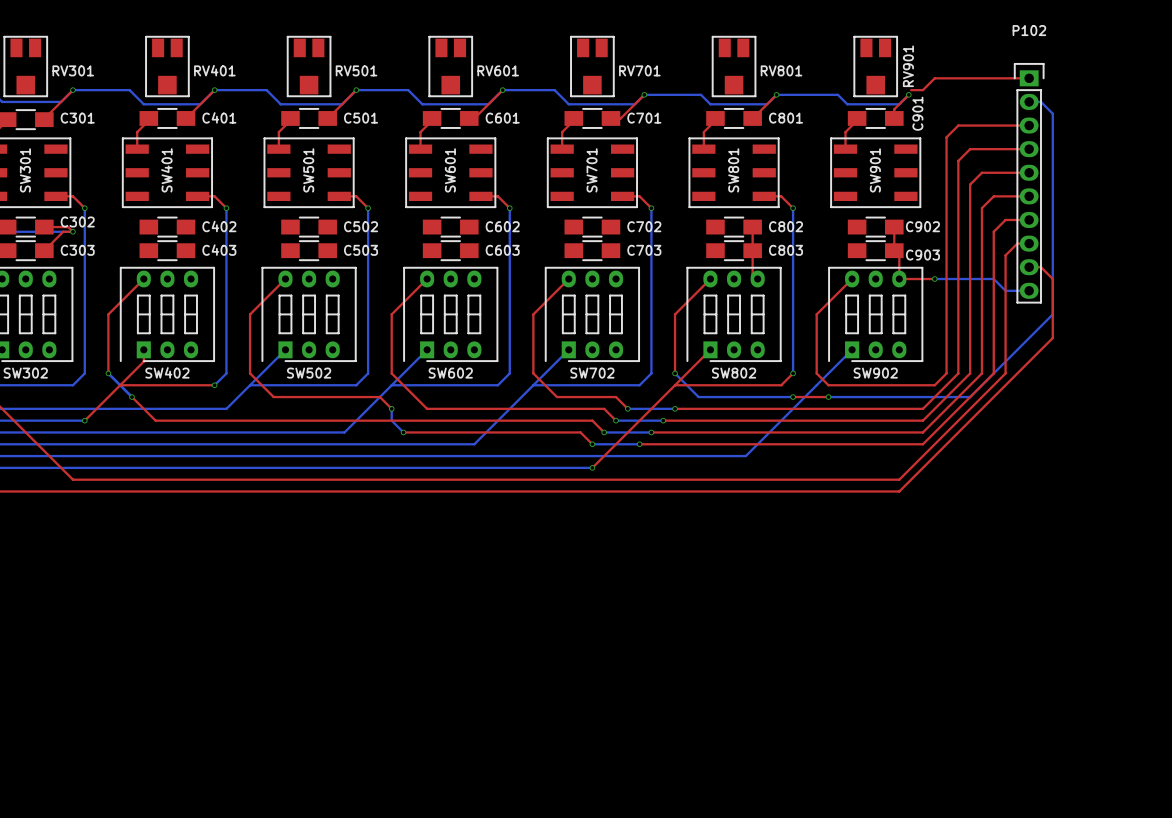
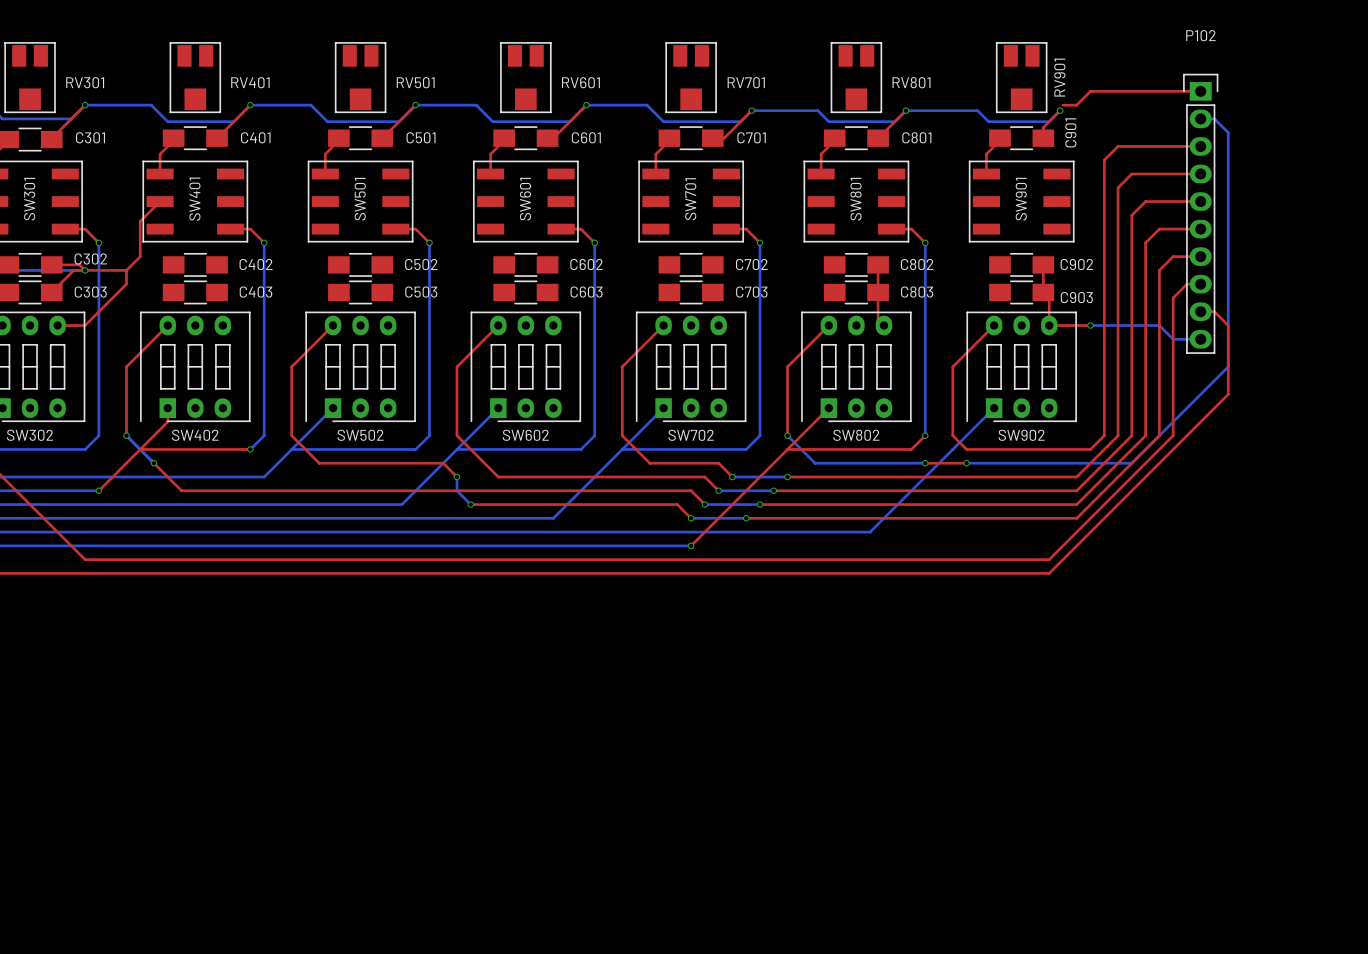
top track: none -> (160, 201) (140, 221) (140, 256) (126, 270)
top track: none -> (85, 270) (126, 270)
top track: none -> (126, 270) (126, 284) (85, 325) (57, 325)

